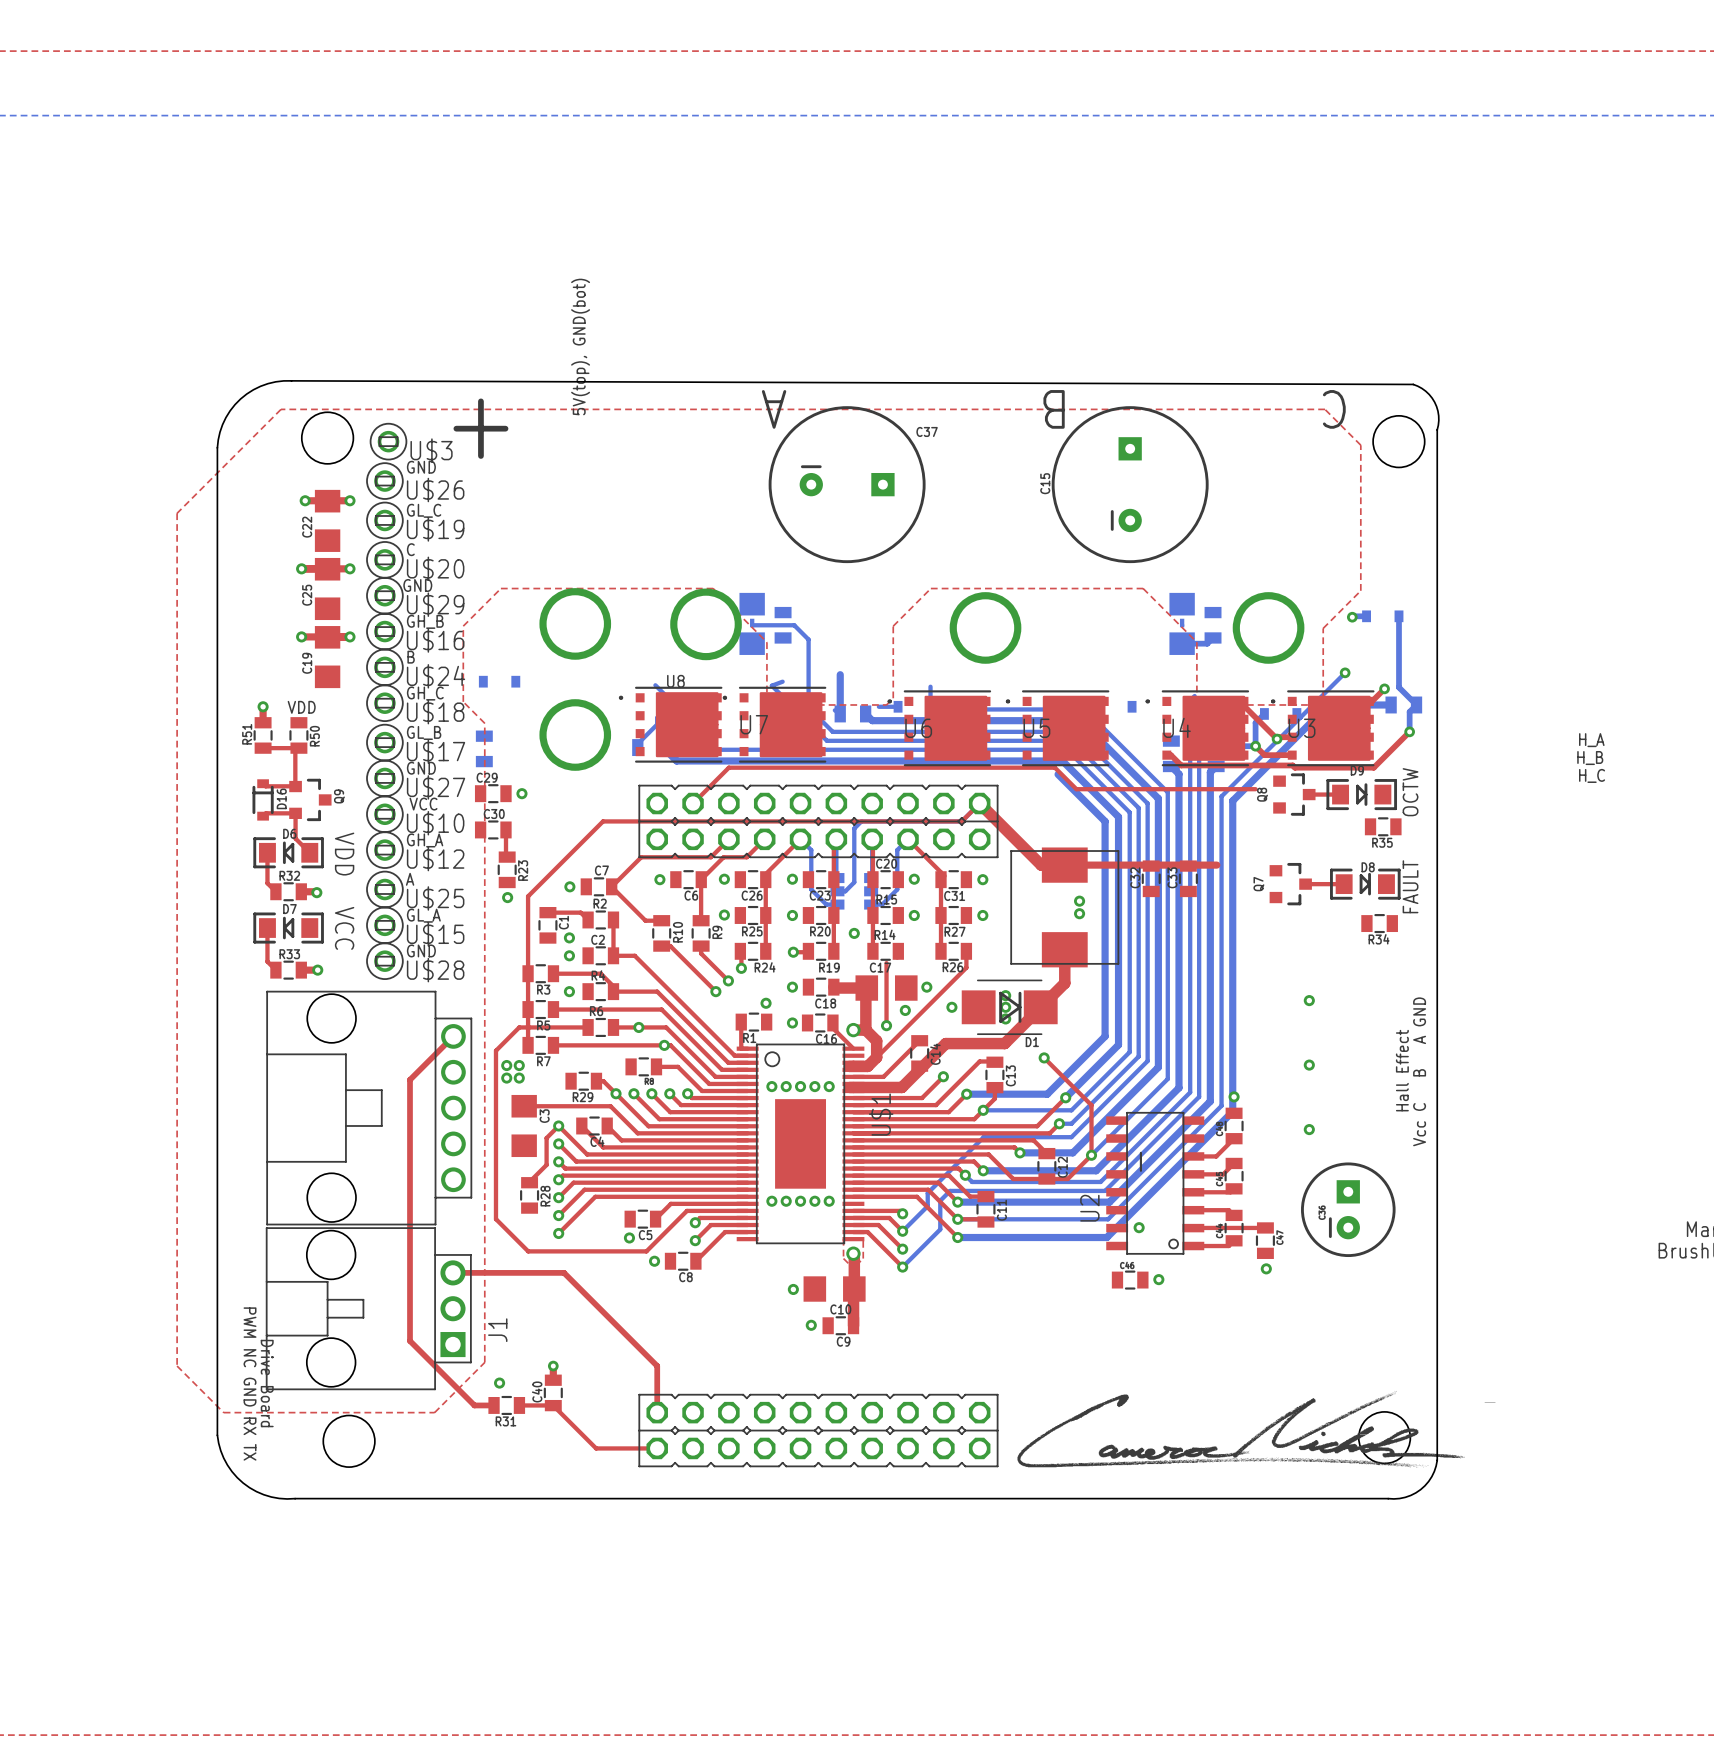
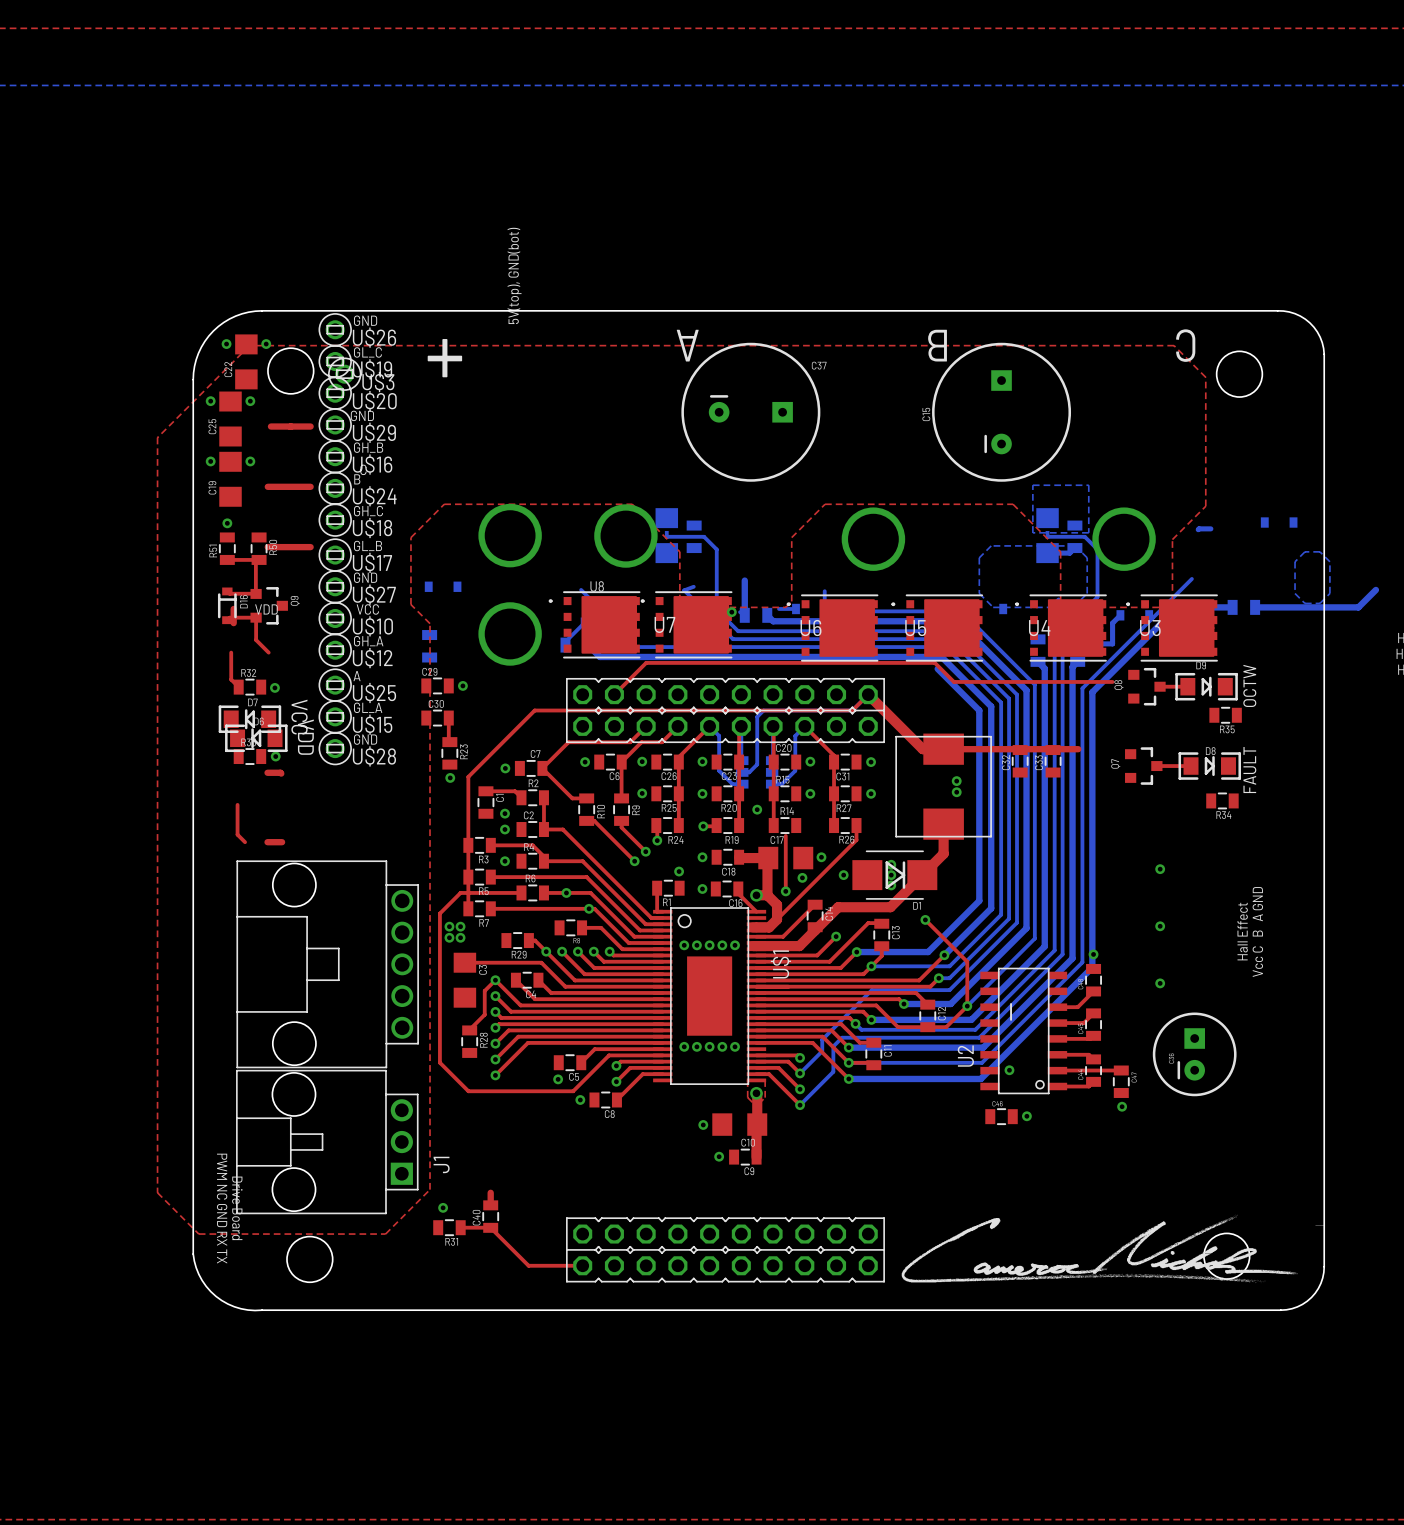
text: none -> GND (365, 320)
via: none -> (226, 344)
via: none -> (266, 344)
board edge: (217, 447) (222, 424) (235, 404) (246, 394) (260, 386) (283, 380) (1413, 384) (1425, 391) (1434, 402) (1438, 420) (1437, 429) (1437, 1460) (1431, 1476) (1420, 1489) (1405, 1497) (1388, 1498) -> (193, 379) (196, 359) (208, 336) (229, 318) (255, 311) (1277, 310) (1294, 313) (1309, 322) (1320, 337) (1324, 354) (1323, 1272) (1315, 1293) (1297, 1306) (1280, 1310) (1230, 1310)
text position: GND (421, 467) -> GND (362, 415)
via: none -> (210, 401)
via: none -> (250, 401)
U$26 position: (384, 481) -> (335, 329)
via: (305, 500) -> none
via: (349, 500) -> none
text position: GL_C (424, 510) -> GL_C (367, 352)
C22 position: (327, 520) -> (246, 361)
U$19 position: (384, 520) -> (335, 361)
via: none -> (210, 461)
via: none -> (250, 461)
U$20 position: (384, 559) -> (335, 393)
bottom zone outline: none -> (1032, 485) (1088, 485) (1088, 532) (1032, 532) (1032, 485)
via: (301, 568) -> none
via: (349, 568) -> none
text: GND (417, 585) -> none
C25 position: (327, 588) -> (230, 419)
U$29 position: (384, 595) -> (335, 424)
via: none -> (227, 523)
part position: (1382, 616) -> (1279, 522)
bottom track: (1398, 616) (1398, 687) (1416, 704) (1409, 711) (1409, 731) -> none
via: (1352, 617) -> none
text position: GH_B (425, 621) -> GH_B (368, 447)
bottom track: none -> (1047, 536) (1084, 536) (1097, 549) (1097, 597) (1062, 631)
U$16 position: (384, 631) -> (335, 456)
bottom zone outline: none -> (991, 545) (1075, 545) (1087, 557) (1087, 593) (1073, 607) (993, 607) (979, 593) (979, 557) (991, 545)
via: (301, 636) -> none
via: (349, 636) -> none
bottom zone outline: none -> (1304, 551) (1320, 551) (1329, 561) (1329, 593) (1320, 603) (1304, 603) (1295, 593) (1295, 561) (1304, 551)
C19 position: (327, 657) -> (230, 479)
text position: B (411, 657) -> B (357, 479)
U$24 position: (384, 667) -> (335, 488)
text: none -> GND (365, 577)
via: (1345, 672) -> none
bottom track: none -> (1375, 589) (1358, 607) (1255, 607)
top track: (1384, 688) (1372, 701) (1369, 701) -> none
via: (1384, 688) -> none
text position: GH_C (425, 693) -> GH_C (368, 511)
top track: (1243, 701) (1243, 705) (1277, 739) (1278, 737) (1292, 737) -> none
U$18 position: (384, 703) -> (335, 520)
via: (263, 706) -> none
text: none -> VCC (367, 609)
via: none -> (731, 612)
top track: (1409, 731) (1373, 767) (1181, 765) (1170, 755) (1166, 755) -> none
via: (1409, 731) -> none
text position: GL_B (424, 732) -> GL_B (368, 546)
R51 position: (263, 735) -> (227, 548)
R50 position: (298, 735) -> (259, 548)
via: (1277, 739) -> none
U$17 position: (384, 742) -> (335, 555)
top track: (1255, 746) (1264, 755) (1292, 755) -> none
via: (1255, 746) -> none
top track: (263, 748) (298, 748) -> (227, 559) (259, 559)
top track: (295, 748) (295, 786) -> (255, 559) (255, 593)
text: GND (421, 768) -> none
U$27 position: (384, 778) -> (335, 586)
top track: (263, 783) (265, 786) (295, 786) -> (227, 591) (229, 593) (255, 593)
via: none -> (274, 687)
D16 position: (263, 799) -> (227, 605)
Q9 position: (310, 799) -> (269, 605)
text: VCC (423, 804) -> none
U$10 position: (384, 814) -> (335, 618)
top track: (263, 816) (265, 813) (295, 813) (295, 838) (309, 852) -> (227, 620) (229, 617) (256, 617) (256, 640) (268, 652)
text: none -> VCC (299, 717)
text position: GH_A (425, 840) -> GH_A (368, 641)
U$12 position: (384, 850) -> (335, 650)
top track: (267, 852) (267, 883) (275, 891) -> (231, 652) (231, 679) (238, 687)
text: none -> GND (365, 739)
text position: A (410, 879) -> A (357, 676)
U$25 position: (384, 889) -> (335, 685)
R32 position: (288, 891) -> (249, 687)
via position: (316, 892) -> (275, 756)
text position: GL_A (423, 915) -> GL_A (368, 707)
U$15 position: (384, 925) -> (335, 716)
D7 position: (288, 928) -> (249, 719)
text: VCC (344, 928) -> none
text: GND (421, 950) -> none
U$28 position: (384, 961) -> (335, 748)
R33 position: (288, 970) -> (249, 756)
via: (317, 970) -> none
top track: (453, 1036) (409, 1079) (409, 1340) (474, 1405) (494, 1405) -> none
top track: (452, 1272) (564, 1272) (657, 1366) (657, 1412) -> none
via: (553, 1366) -> none

